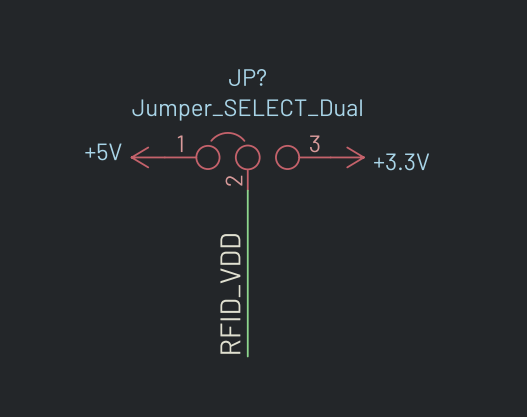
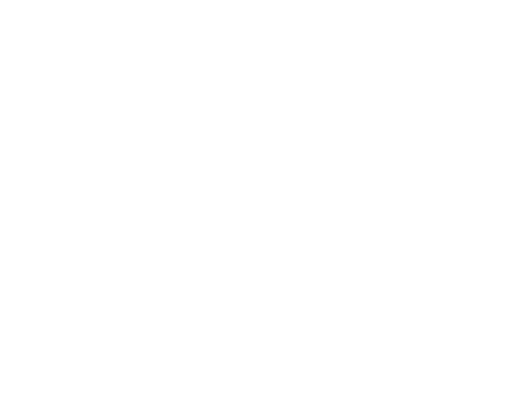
power symbol: +5V (148, 157) -> none
power symbol: +3.3V (347, 157) -> none
JP?: Jumper_SELECT_Dual (247, 161) -> none
wire: (247, 190) (247, 356) -> none
label: RFID_VDD (230, 293) -> none

